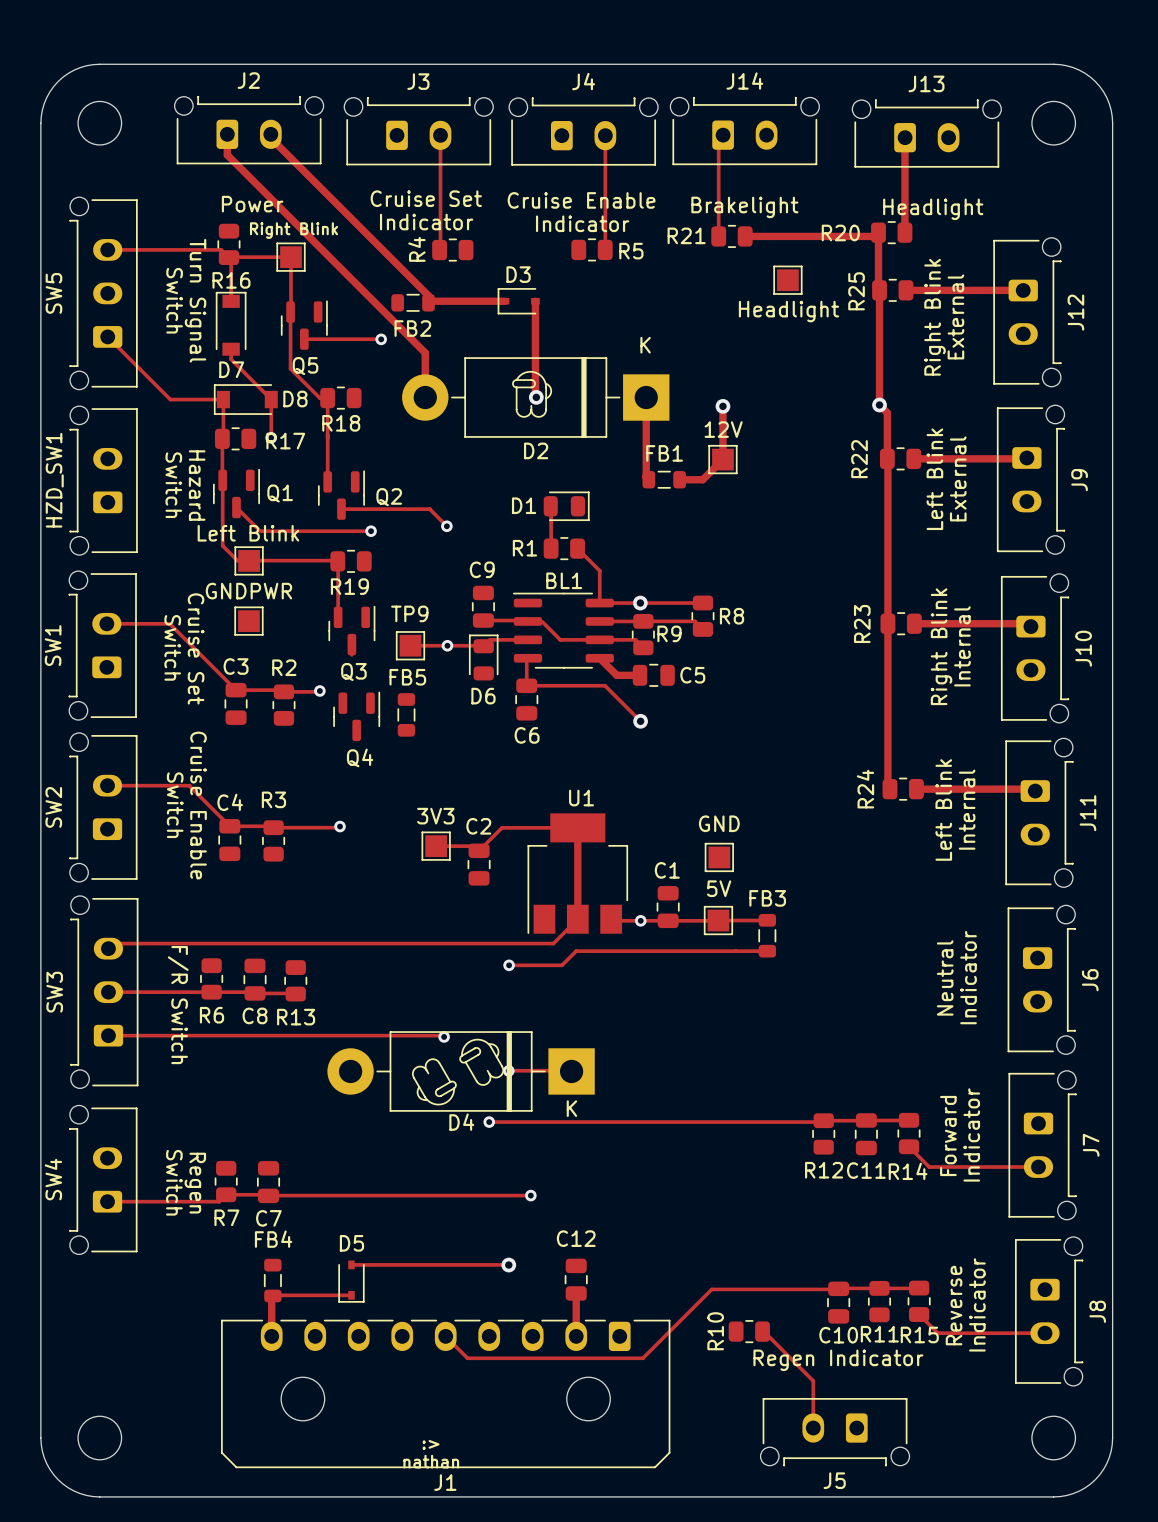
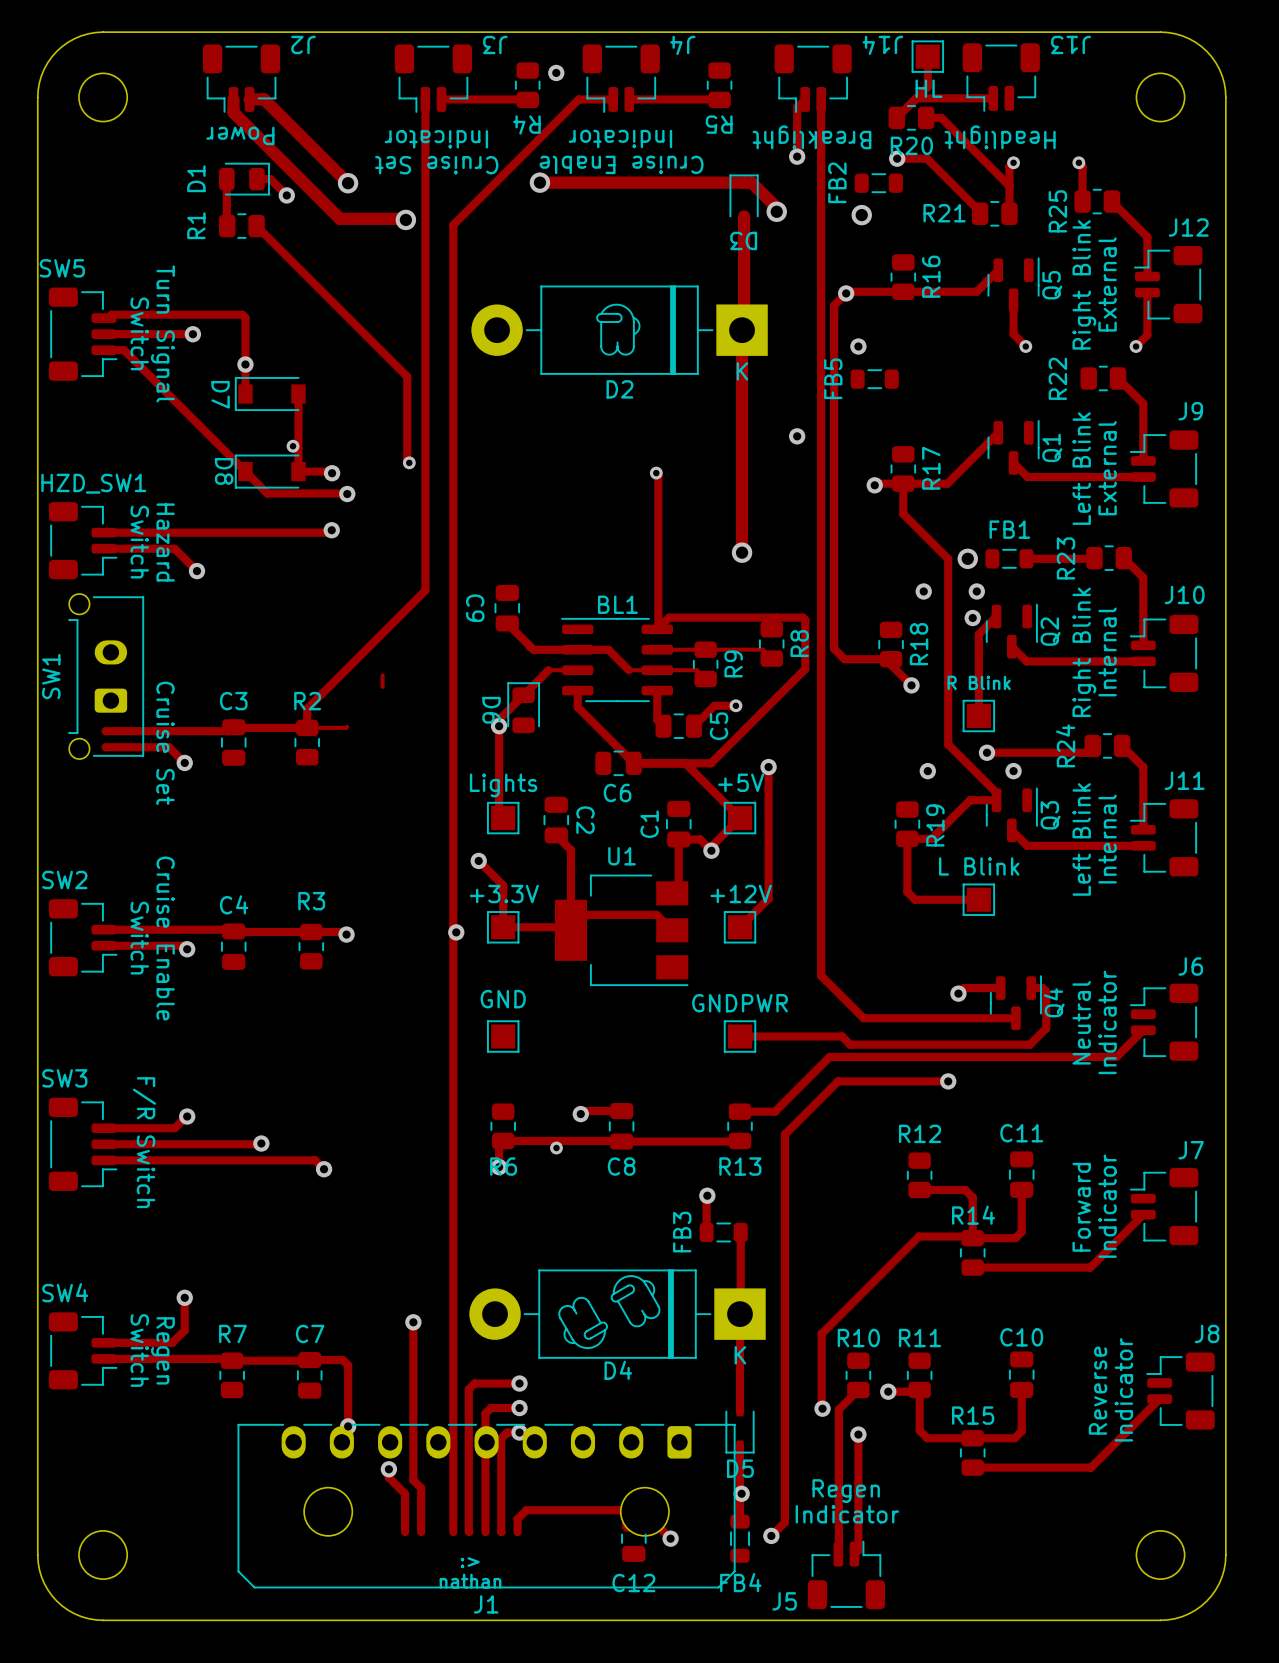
J2 name position: J2 (248, 80) -> J2 (303, 44)
J3 name position: J3 (418, 81) -> J3 (495, 44)
J4 name position: J4 (583, 81) -> J4 (682, 45)
J14 name position: J14 (744, 81) -> J14 (882, 45)
J13 name position: J13 (926, 83) -> J13 (1071, 44)
track: none -> (927, 56) (927, 86) (896, 117)
HL: none -> (927, 56)
J2 footprint: [174, 96, 324, 165] -> [202, 44, 281, 113]
J14 footprint: [670, 96, 820, 166] -> [774, 44, 852, 113]
J3 footprint: [344, 97, 494, 166] -> [394, 44, 473, 113]
J4 footprint: [509, 97, 659, 166] -> [582, 44, 660, 113]
J13 footprint: [852, 99, 1002, 168] -> [962, 43, 1040, 112]
via: none -> (556, 72)
track: none -> (916, 98) (993, 98)
track: none -> (233, 99) (233, 112) (339, 218) (405, 219)
track: none -> (249, 99) (264, 99) (348, 183)
track: none -> (425, 99) (425, 590) (307, 708) (307, 727) (233, 727) (229, 731) (105, 731)
track: none -> (441, 99) (527, 99)
track: none -> (613, 99) (578, 99) (453, 224) (453, 1532)
track: none -> (629, 99) (719, 99)
track: none -> (805, 99) (797, 107) (797, 156)
track: none -> (821, 99) (821, 975) (863, 1018) (1015, 1018)
track: (227, 134) (227, 154) (425, 352) (425, 397) -> none
track: (440, 135) (439, 250) -> none
track: (605, 135) (605, 249) -> none
track: (723, 135) (718, 139) (718, 236) -> none
track: (904, 137) (904, 232) -> none
track: (270, 138) (428, 295) (428, 302) (430, 301) (505, 301) -> none
track: none -> (926, 117) (941, 117) (1009, 186)
text: none -> Breaklight (812, 137)
via: none -> (797, 156)
track: none -> (897, 158) (927, 158) (980, 211)
via: none -> (897, 158)
track: none -> (1013, 162) (1009, 166) (1009, 213)
via: none -> (1013, 162)
track: none -> (1078, 162) (1082, 166) (1082, 201)
via: none -> (1078, 162)
track: none -> (226, 179) (227, 226)
track: none -> (256, 179) (270, 179) (286, 195)
SW5 footprint: [69, 197, 138, 390] -> [48, 287, 118, 381]
text rotation: 0° (426, 198) -> 180° (436, 165)
via: none -> (348, 183)
track: none -> (539, 182) (751, 182) (776, 207) (776, 211)
via: none -> (539, 182)
text rotation: 0° (581, 200) -> 180° (621, 164)
text rotation: 0° (252, 204) -> 180° (240, 135)
text: Brakelight (744, 207) -> none
text rotation: 0° (933, 209) -> 180° (1000, 137)
via: none -> (286, 195)
track: none -> (1111, 201) (1147, 237) (1147, 276)
text rotation: 0° (426, 222) -> 180° (436, 139)
text rotation: 0° (582, 223) -> 180° (620, 139)
via: none -> (776, 211)
via: none -> (861, 215)
track: none -> (744, 216) (742, 552)
R20 name position: R20 (840, 232) -> R20 (911, 145)
R20 position: (891, 232) -> (911, 117)
via: none -> (405, 219)
R21 position: (731, 236) -> (994, 213)
track: (745, 236) (874, 236) (878, 232) (879, 405) (887, 412) (887, 458) -> none
J12 footprint: [993, 237, 1062, 387] -> [1133, 246, 1203, 324]
track: none -> (256, 226) (407, 376) (407, 460) (409, 462)
R16 position: (228, 244) -> (903, 277)
R4 name position: R4 (416, 249) -> R4 (526, 124)
R5 rotation: 0° (592, 249) -> 90° clockwise (719, 85)
R5 position: (592, 249) -> (719, 85)
R4 rotation: 0° (452, 250) -> 90° clockwise (527, 85)
R4 position: (452, 250) -> (527, 85)
track: (228, 257) (291, 257) (291, 311) -> none
Right Blink: (291, 257) -> none
track: (115, 258) (107, 249) (221, 249) (231, 259) (231, 301) -> none
D3 name position: D3 (518, 274) -> D3 (743, 240)
track: none -> (998, 270) (976, 291) (847, 291)
R16 name rotation: 0° (231, 280) -> 90° counterclockwise (931, 276)
Headlight: (787, 280) -> none
R25 position: (892, 290) -> (1097, 201)
track: (905, 290) (1023, 290) -> none
R25 name position: R25 (856, 291) -> R25 (1057, 211)
SW5 name position: SW5 (53, 293) -> SW5 (62, 268)
track: none -> (846, 293) (834, 305) (834, 648) (844, 659) (891, 659) (891, 664) (911, 685)
via: none -> (846, 293)
track: none -> (1147, 292) (1147, 335) (1136, 346)
text position: Switch (174, 300) -> Switch (139, 333)
text position: Turn Signal (195, 300) -> Turn Signal (162, 333)
D3 rotation: 0° (518, 301) -> 90° clockwise (744, 197)
D3 position: (518, 301) -> (744, 197)
track: (535, 301) (536, 397) -> none
FB2 position: (413, 302) -> (878, 183)
track: none -> (1013, 300) (1013, 334) (1025, 346)
track: (290, 312) (290, 368) (319, 398) (327, 398) (327, 481) -> none
J12 name position: J12 (1075, 312) -> J12 (1188, 227)
text position: External (955, 316) -> External (1107, 284)
text position: Right Blink (935, 317) -> Right Blink (1084, 284)
track: none -> (108, 318) (111, 314) (242, 314) (245, 318) (245, 394)
D7 rotation: 0° (231, 323) -> 90° counterclockwise (270, 394)
D7 position: (231, 323) -> (270, 394)
Q5 position: (304, 325) -> (1013, 284)
FB2 name rotation: 0° (412, 328) -> 90° counterclockwise (837, 182)
track: (107, 336) (170, 399) (223, 399) (222, 545) (237, 560) (337, 560) (338, 617) -> none
via: none -> (192, 334)
track: (304, 339) (381, 339) -> (108, 334) (192, 334)
via: (381, 339) -> none
D2 text position: K (645, 345) -> K (742, 371)
via: none -> (858, 346)
via: none -> (1025, 346)
via: none -> (1136, 346)
track: (231, 349) (231, 359) (271, 399) (271, 437) -> none
track: none -> (108, 350) (124, 350) (267, 493) (347, 494)
via: none -> (245, 364)
Q5 name rotation: 0° (305, 366) -> 90° counterclockwise (1052, 285)
Q5 name position: Q5 (305, 366) -> Q5 (1052, 285)
D7 name position: D7 (231, 369) -> D7 (220, 394)
track: none -> (1118, 378) (1143, 403) (1143, 460)
line: (516, 380) (532, 380) (535, 383) (532, 387) (516, 387) -> (601, 313) (618, 313) (621, 317) (618, 321) (601, 322)
line: (516, 380) (523, 373) (530, 371) (539, 374) (544, 380) (546, 387) (545, 412) (542, 415) (537, 416) (533, 414) (531, 409) -> (601, 313) (606, 307) (616, 304) (626, 307) (631, 313) (633, 322) (633, 349) (628, 354) (623, 354) (619, 351) (617, 346)
line: (516, 380) (512, 383) (516, 387) -> (601, 313) (597, 317) (601, 322)
line: (546, 383) (551, 391) (546, 398) -> (633, 317) (637, 321) (639, 326) (637, 331) (633, 334)
line: (516, 387) (517, 413) (521, 416) (525, 416) (529, 414) (531, 409) -> (601, 322) (602, 350) (606, 354) (611, 354) (615, 351) (617, 346)
track: none -> (298, 394) (298, 471) (330, 471) (332, 473)
D2 position: (535, 397) -> (619, 330)
via: (536, 397) -> none
track: (646, 397) (646, 477) (648, 479) -> none
R18 rotation: 0° (340, 398) -> 90° clockwise (891, 644)
R18 position: (340, 398) -> (891, 644)
D8 position: (245, 399) -> (270, 471)
D8 name rotation: 0° (295, 399) -> 90° clockwise (224, 471)
D8 name position: D8 (295, 399) -> D8 (224, 471)
line: (531, 405) (531, 409) -> (617, 342) (617, 346)
via: (879, 405) -> none
J9 footprint: [996, 405, 1066, 555] -> [1129, 430, 1199, 508]
HZD_SW1 footprint: [69, 406, 138, 556] -> [48, 502, 118, 580]
track: (722, 406) (722, 459) (702, 479) (679, 479) -> none
via position: (722, 406) -> (797, 436)
R18 name position: R18 (341, 423) -> R18 (919, 644)
track: none -> (998, 432) (947, 483) (876, 483) (874, 485)
R17 rotation: 0° (235, 438) -> 90° clockwise (903, 468)
R17 position: (235, 438) -> (903, 468)
via: none -> (409, 462)
track: none -> (1013, 462) (1027, 477) (1143, 477)
track: (1026, 457) (913, 458) -> none
R22 position: (900, 458) -> (1103, 378)
12V: (722, 459) -> none
via: none -> (332, 473)
track: none -> (656, 473) (658, 475) (658, 628)
via: none -> (656, 473)
track: (887, 463) (887, 787) (889, 789) -> none
track: none -> (903, 483) (903, 514) (948, 558) (948, 744) (996, 792) (996, 800) (970, 800) (931, 838) (907, 838) (907, 892) (915, 899) (978, 899)
via: none -> (874, 485)
text position: External (958, 478) -> External (1107, 468)
FB1 position: (664, 479) -> (1009, 558)
text position: Left Blink (934, 479) -> Left Blink (1081, 468)
HZD_SW1 name position: HZD_SW1 (54, 480) -> HZD_SW1 (93, 483)
via: none -> (347, 494)
J9 name position: J9 (1079, 480) -> J9 (1190, 411)
text position: Switch (173, 485) -> Switch (139, 542)
text position: Hazard (197, 485) -> Hazard (165, 542)
Q1 position: (236, 493) -> (1013, 447)
Q1 name rotation: 0° (280, 493) -> 90° counterclockwise (1052, 447)
Q2 position: (341, 495) -> (1011, 631)
Q2 name rotation: 0° (389, 497) -> 90° counterclockwise (1050, 631)
D1 name rotation: 0° (524, 505) -> 90° counterclockwise (196, 178)
track: (550, 506) (551, 548) -> none
D1 position: (566, 506) -> (244, 179)
track: (236, 507) (260, 531) (371, 531) -> none
track: (341, 509) (429, 509) (446, 526) -> none
track: none -> (331, 530) (329, 532) (101, 532)
via: none -> (331, 530)
via: (446, 526) -> none
track: none -> (101, 548) (174, 548) (197, 571)
via: (371, 531) -> none
via: none -> (742, 552)
track: none -> (1094, 558) (1026, 558)
track: none -> (1123, 558) (1143, 577) (1143, 645)
via: none -> (967, 558)
R1 name rotation: 0° (524, 548) -> 90° counterclockwise (196, 225)
R1 position: (564, 548) -> (241, 226)
track: (577, 548) (599, 570) (599, 603) (695, 603) -> none
via: none -> (197, 571)
Left Blink: (249, 560) -> none
R19 rotation: 0° (351, 561) -> 90° clockwise (907, 824)
R19 position: (351, 561) -> (907, 824)
via: none -> (923, 591)
via: none -> (976, 591)
C9 name rotation: 0° (482, 569) -> 90° clockwise (475, 608)
C9 name position: C9 (482, 569) -> C9 (475, 608)
J10 footprint: [1000, 573, 1070, 723] -> [1129, 614, 1199, 692]
R19 name position: R19 (349, 586) -> R19 (935, 825)
track: none -> (996, 616) (978, 634) (978, 716)
via: none -> (972, 618)
via: (640, 603) -> none
C9 position: (483, 606) -> (507, 608)
R8 name rotation: 0° (732, 616) -> 90° counterclockwise (799, 643)
track: none -> (1011, 646) (1026, 661) (1143, 661)
GNDPWR: (248, 621) -> none
track: (542, 621) (560, 639) (574, 639) -> (507, 623) (533, 649) (608, 649) (628, 670)
track: (106, 623) (169, 623) (236, 690) (282, 690) (283, 691) -> none
R23 position: (901, 623) -> (1109, 558)
track: (914, 623) (1028, 623) (1030, 626) -> none
Q3 position: (351, 630) -> (1011, 814)
R9 name rotation: 0° (669, 633) -> 90° counterclockwise (733, 663)
track: (501, 639) (490, 639) (483, 646) (410, 645) -> (548, 670) (499, 719) (499, 813) (503, 818)
TP9: (410, 645) -> none
via: (447, 645) -> none
text position: Right Blink (941, 646) -> Right Blink (1084, 652)
text position: Internal (962, 646) -> Internal (1107, 651)
text: Switch (172, 647) -> none
text position: Cruise Set (196, 648) -> Cruise Set (165, 743)
J10 name position: J10 (1083, 648) -> J10 (1184, 594)
via: none -> (911, 685)
D6 position: (483, 657) -> (523, 707)
track: (527, 658) (526, 685) (605, 685) (640, 721) -> (577, 690) (577, 707) (633, 763) (711, 763) (805, 669) (805, 620) (802, 617) (669, 617) (657, 629)
track: (599, 658) (616, 675) (640, 675) -> (657, 690) (657, 720) (663, 726)
track: none -> (735, 705) (714, 705) (694, 726)
via: none -> (735, 705)
Q3 name rotation: 0° (353, 672) -> 90° counterclockwise (1050, 815)
Q3 name position: Q3 (353, 672) -> Q3 (1050, 815)
C5 position: (653, 675) -> (678, 726)
C5 name rotation: 0° (692, 675) -> 90° counterclockwise (718, 726)
FB5 name position: FB5 (407, 677) -> FB5 (833, 378)
R Blink: none -> (978, 716)
via: (319, 690) -> none
via: none -> (499, 726)
D6 name rotation: 0° (483, 696) -> 90° clockwise (491, 710)
D6 name position: D6 (483, 696) -> D6 (491, 710)
C6 rotation: 0° (526, 699) -> 90° clockwise (618, 763)
C6 position: (526, 699) -> (618, 763)
C3 position: (236, 703) -> (233, 742)
track: none -> (1092, 745) (1085, 752) (987, 752)
track: none -> (1122, 745) (1143, 767) (1143, 829)
track: none -> (105, 747) (169, 747) (184, 762)
FB5 rotation: 0° (406, 714) -> 90° clockwise (874, 379)
FB5 position: (406, 714) -> (874, 379)
via: none -> (987, 752)
Q4 position: (356, 716) -> (1015, 1002)
via: (640, 721) -> none
via: none -> (184, 762)
track: none -> (685, 763) (740, 818) (711, 846) (711, 850) (700, 839) (678, 839) (678, 886) (672, 893)
track: none -> (768, 767) (768, 898) (740, 927)
via: none -> (768, 767)
via: none -> (927, 771)
via: none -> (1013, 771)
SW2 footprint: [69, 732, 138, 882] -> [48, 899, 118, 977]
J11 footprint: [1005, 738, 1074, 888] -> [1129, 799, 1199, 877]
Q4 name rotation: 0° (360, 757) -> 90° counterclockwise (1054, 1002)
Q4 name position: Q4 (360, 757) -> Q4 (1054, 1002)
Lights: none -> (503, 818)
+5V: none -> (740, 818)
track: none -> (1011, 830) (1027, 845) (1143, 845)
track: (107, 785) (189, 785) (229, 826) (340, 826) -> none
track: none -> (556, 835) (570, 850) (570, 930)
R24 position: (903, 789) -> (1107, 745)
track: (916, 789) (1033, 789) (1035, 791) -> none
via: none -> (711, 850)
text position: Switch (175, 805) -> Switch (139, 938)
text position: Cruise Enable (198, 805) -> Cruise Enable (165, 938)
SW2 name position: SW2 (53, 807) -> SW2 (64, 879)
text position: Left Blink (943, 809) -> Left Blink (1081, 839)
text position: Internal (967, 809) -> Internal (1107, 839)
track: none -> (478, 860) (503, 885) (503, 927) (567, 927) (570, 930)
via: none -> (478, 860)
J11 name position: J11 (1087, 813) -> J11 (1184, 780)
via: (340, 826) -> none
C2 name rotation: 0° (478, 826) -> 90° clockwise (585, 820)
C2 name position: C2 (478, 826) -> C2 (585, 820)
C4 position: (229, 840) -> (233, 946)
R3 position: (273, 840) -> (311, 946)
track: (436, 846) (474, 846) (479, 850) (501, 827) (577, 827) (577, 919) (553, 943) (113, 943) (108, 948) -> none
3V3: (436, 846) -> none
L Blink: none -> (978, 899)
GND position: (719, 857) -> (503, 1036)
C2 position: (479, 864) -> (556, 820)
C1 name rotation: 0° (667, 870) -> 90° counterclockwise (649, 824)
C1 name position: C1 (667, 870) -> C1 (649, 824)
+3.3V: none -> (503, 927)
+12V: none -> (740, 927)
track: none -> (105, 929) (232, 929) (234, 932) (344, 932) (346, 934)
U1 rotation: 0° (577, 873) -> 90° counterclockwise (621, 930)
track: none -> (570, 930) (586, 914) (656, 914) (672, 930)
via: none -> (456, 932)
via: none -> (346, 934)
track: none -> (103, 945) (183, 945) (187, 949)
via: none -> (187, 949)
SW3 footprint: [70, 895, 139, 1089] -> [48, 1097, 118, 1191]
FB3 name position: FB3 (767, 898) -> FB3 (682, 1232)
J6 footprint: [1007, 905, 1076, 1055] -> [1129, 983, 1199, 1061]
C1 position: (668, 907) -> (678, 824)
track: (611, 919) (612, 920) (767, 920) -> none
via: (640, 920) -> none
5V: (718, 920) -> none
track: none -> (1000, 988) (963, 988) (958, 993)
track: none -> (1031, 988) (1042, 988) (1046, 991) (1046, 1028) (1029, 1044) (850, 1044) (842, 1036) (740, 1036)
via: none -> (958, 993)
FB3 rotation: 0° (767, 935) -> 90° clockwise (723, 1232)
FB3 position: (767, 935) -> (723, 1232)
track: (767, 951) (576, 951) (562, 965) (509, 965) -> none
track: none -> (1143, 1030) (1116, 1056) (829, 1056) (775, 1111) (740, 1111)
via: (509, 965) -> none
GNDPWR: none -> (740, 1036)
text position: Neutral (945, 977) -> Neutral (1081, 1022)
text position: Indicator (968, 977) -> Indicator (1107, 1022)
R6 position: (211, 978) -> (503, 1126)
C8 position: (255, 979) -> (621, 1126)
R13 position: (295, 980) -> (740, 1126)
J6 name position: J6 (1090, 980) -> J6 (1190, 966)
SW3 name position: SW3 (54, 992) -> SW3 (64, 1078)
track: (108, 992) (295, 994) -> none
text position: F/R Switch (178, 1005) -> F/R Switch (144, 1142)
track: none -> (948, 1081) (837, 1081) (784, 1134) (784, 1522) (771, 1535)
via: none -> (948, 1081)
track: (108, 1035) (444, 1036) -> none
via: (444, 1036) -> none
track: none -> (621, 1111) (583, 1111) (580, 1114)
via: none -> (580, 1114)
track: none -> (187, 1116) (174, 1128) (103, 1128)
via: none -> (187, 1116)
line: (489, 1044) (497, 1048) (496, 1057) -> (644, 1281) (649, 1281) (653, 1285) (654, 1290) (652, 1295)
line: (461, 1055) (475, 1048) (479, 1049) (479, 1054) (465, 1062) -> (613, 1294) (628, 1285) (633, 1287) (632, 1292) (617, 1301)
line: (461, 1055) (460, 1060) (465, 1062) -> none
line: (461, 1055) (464, 1046) (469, 1041) (477, 1039) (486, 1042) (491, 1047) (503, 1069) (502, 1073) (498, 1077) (493, 1077) (489, 1073) -> none
line: (465, 1062) (479, 1083) (484, 1084) (488, 1082) (490, 1078) (489, 1073) -> none
track: none -> (740, 1140) (503, 1140) (499, 1145) (499, 1167)
track: none -> (261, 1143) (109, 1144)
via: none -> (261, 1143)
line: (426, 1070) (428, 1073) -> (574, 1310) (576, 1313)
line: (426, 1070) (423, 1067) (418, 1066) (413, 1070) (412, 1075) (430, 1102) (439, 1104) (446, 1102) (451, 1097) (454, 1088) -> none
line: (426, 1070) (427, 1061) (430, 1059) (436, 1059) (450, 1082) -> none
line: (487, 1070) (489, 1073) -> (642, 1310) (644, 1314)
track: (508, 1070) (574, 1070) (571, 1071) -> none
J7 footprint: [1008, 1070, 1077, 1220] -> [1129, 1168, 1199, 1246]
D4 position: (461, 1071) -> (617, 1314)
track: none -> (109, 1160) (315, 1160) (324, 1169)
line: (450, 1082) (436, 1089) (436, 1094) (440, 1096) (454, 1088) -> none
line: (450, 1082) (455, 1083) (454, 1088) -> none
line: (419, 1087) (418, 1096) (426, 1099) -> (566, 1328) (564, 1333) (565, 1338) (569, 1342) (574, 1342)
via: none -> (499, 1167)
via: none -> (324, 1169)
SW4 footprint: [69, 1105, 138, 1255] -> [48, 1312, 118, 1390]
track: none -> (919, 1189) (965, 1189) (972, 1197) (972, 1238)
track: none -> (1021, 1189) (1021, 1231) (1015, 1238) (972, 1238)
track: none -> (707, 1195) (706, 1232)
via: none -> (707, 1195)
track: (908, 1120) (489, 1122) -> none
via: (489, 1122) -> none
track: none -> (1143, 1214) (1090, 1267) (972, 1267)
R12 position: (823, 1133) -> (919, 1175)
R14 position: (908, 1133) -> (972, 1252)
C11 position: (866, 1134) -> (1021, 1174)
text position: Indicator (971, 1134) -> Indicator (1107, 1206)
text position: Forward (948, 1135) -> Forward (1081, 1207)
J7 name position: J7 (1091, 1145) -> J7 (1191, 1150)
track: (908, 1146) (929, 1167) (1038, 1167) -> none
track: none -> (740, 1232) (740, 1411)
track: none -> (972, 1238) (971, 1236) (918, 1236) (821, 1333) (822, 1408)
R12 name position: R12 (824, 1170) -> R12 (920, 1133)
C11 name position: C11 (866, 1170) -> C11 (1021, 1133)
R14 name position: R14 (908, 1171) -> R14 (973, 1215)
SW4 name position: SW4 (53, 1179) -> SW4 (65, 1292)
R7 position: (226, 1181) -> (232, 1375)
text position: Switch (174, 1182) -> Switch (139, 1350)
C7 position: (268, 1182) -> (309, 1375)
text position: Regen (195, 1183) -> Regen (162, 1350)
track: (530, 1195) (226, 1194) (219, 1201) (107, 1201) -> none
via: (530, 1195) -> none
line: none -> (613, 1294) (612, 1299) (617, 1301)
line: none -> (613, 1294) (615, 1285) (622, 1278) (630, 1276) (640, 1278) (646, 1284) (659, 1308) (658, 1314) (654, 1317) (648, 1317) (644, 1314)
track: none -> (184, 1297) (184, 1330) (172, 1342) (105, 1342)
via: none -> (184, 1297)
line: none -> (617, 1301) (633, 1325) (642, 1324) (645, 1319) (644, 1314)
R7 name position: R7 (226, 1217) -> R7 (232, 1333)
line: none -> (574, 1310) (570, 1306) (565, 1306) (560, 1309) (559, 1315) (572, 1339) (578, 1345) (586, 1348) (596, 1345) (603, 1338) (604, 1330)
line: none -> (574, 1310) (573, 1304) (575, 1300) (580, 1297) (585, 1298) (600, 1323)
C7 name position: C7 (268, 1218) -> C7 (310, 1333)
track: none -> (413, 1322) (413, 1480) (421, 1488) (421, 1532)
via: none -> (413, 1322)
line: none -> (600, 1323) (585, 1331) (585, 1336) (589, 1338) (604, 1330)
line: none -> (600, 1323) (606, 1324) (604, 1330)
J8 footprint: [1014, 1236, 1084, 1386] -> [1146, 1352, 1215, 1430]
C12 name position: C12 (576, 1238) -> C12 (633, 1582)
FB4 name position: FB4 (273, 1239) -> FB4 (740, 1582)
D5 name position: D5 (351, 1243) -> D5 (740, 1468)
track: none -> (105, 1358) (342, 1360) (348, 1365) (348, 1426)
track: (351, 1264) (508, 1264) -> none
via: (508, 1265) -> none
C12 position: (576, 1279) -> (633, 1538)
FB4 position: (272, 1280) -> (740, 1538)
D5 position: (351, 1281) -> (740, 1430)
track: none -> (519, 1383) (474, 1383) (468, 1389) (469, 1532)
via: none -> (519, 1383)
track: (919, 1288) (838, 1288) -> none
track: none -> (858, 1390) (838, 1409) (838, 1554)
track: (838, 1289) (711, 1289) (642, 1358) (467, 1358) (445, 1336) -> none
track: none -> (1021, 1389) (1021, 1431) (1014, 1438) (927, 1438) (919, 1430) (919, 1390) (917, 1391) (888, 1391)
via: none -> (888, 1391)
track: (576, 1293) (576, 1336) -> none
track: (351, 1295) (273, 1295) (271, 1297) (271, 1336) -> none
track: none -> (1159, 1399) (1091, 1467) (972, 1467)
R11 position: (879, 1301) -> (919, 1375)
R15 position: (919, 1301) -> (972, 1452)
C10 position: (838, 1302) -> (1021, 1374)
text position: Indicator (977, 1304) -> Indicator (1123, 1389)
track: none -> (519, 1408) (490, 1408) (485, 1413) (485, 1532)
via: none -> (519, 1408)
text position: Reverse (954, 1305) -> Reverse (1098, 1390)
via: none -> (822, 1408)
J8 name position: J8 (1097, 1311) -> J8 (1207, 1333)
track: (919, 1314) (937, 1333) (1045, 1333) -> none
via: none -> (348, 1426)
track: none -> (519, 1432) (507, 1432) (501, 1438) (501, 1532)
via: none -> (519, 1432)
track: none -> (858, 1434) (858, 1550) (854, 1554)
via: none -> (858, 1434)
R10 rotation: 0° (749, 1331) -> 90° clockwise (858, 1375)
R10 position: (749, 1331) -> (858, 1375)
track: (763, 1331) (813, 1380) (813, 1428) -> none
R11 name position: R11 (879, 1334) -> R11 (920, 1338)
R15 name position: R15 (919, 1334) -> R15 (973, 1415)
C10 name position: C10 (838, 1335) -> C10 (1021, 1337)
track: none -> (740, 1445) (740, 1492) (741, 1493) (740, 1495) (740, 1521)
track: none -> (388, 1469) (388, 1477) (405, 1493) (405, 1532)
via: none -> (388, 1469)
text: Regen Indicator (838, 1360) -> none
text: none -> Regen (846, 1491)
via: none -> (741, 1493)
J5 footprint: [760, 1398, 910, 1467] -> [807, 1540, 885, 1610]
text: none -> Indicator (847, 1514)
track: none -> (517, 1532) (517, 1519) (526, 1510) (620, 1510) (633, 1523) (655, 1523) (670, 1538)
via: none -> (771, 1535)
via: none -> (670, 1538)
J5 name position: J5 (834, 1480) -> J5 (784, 1601)

